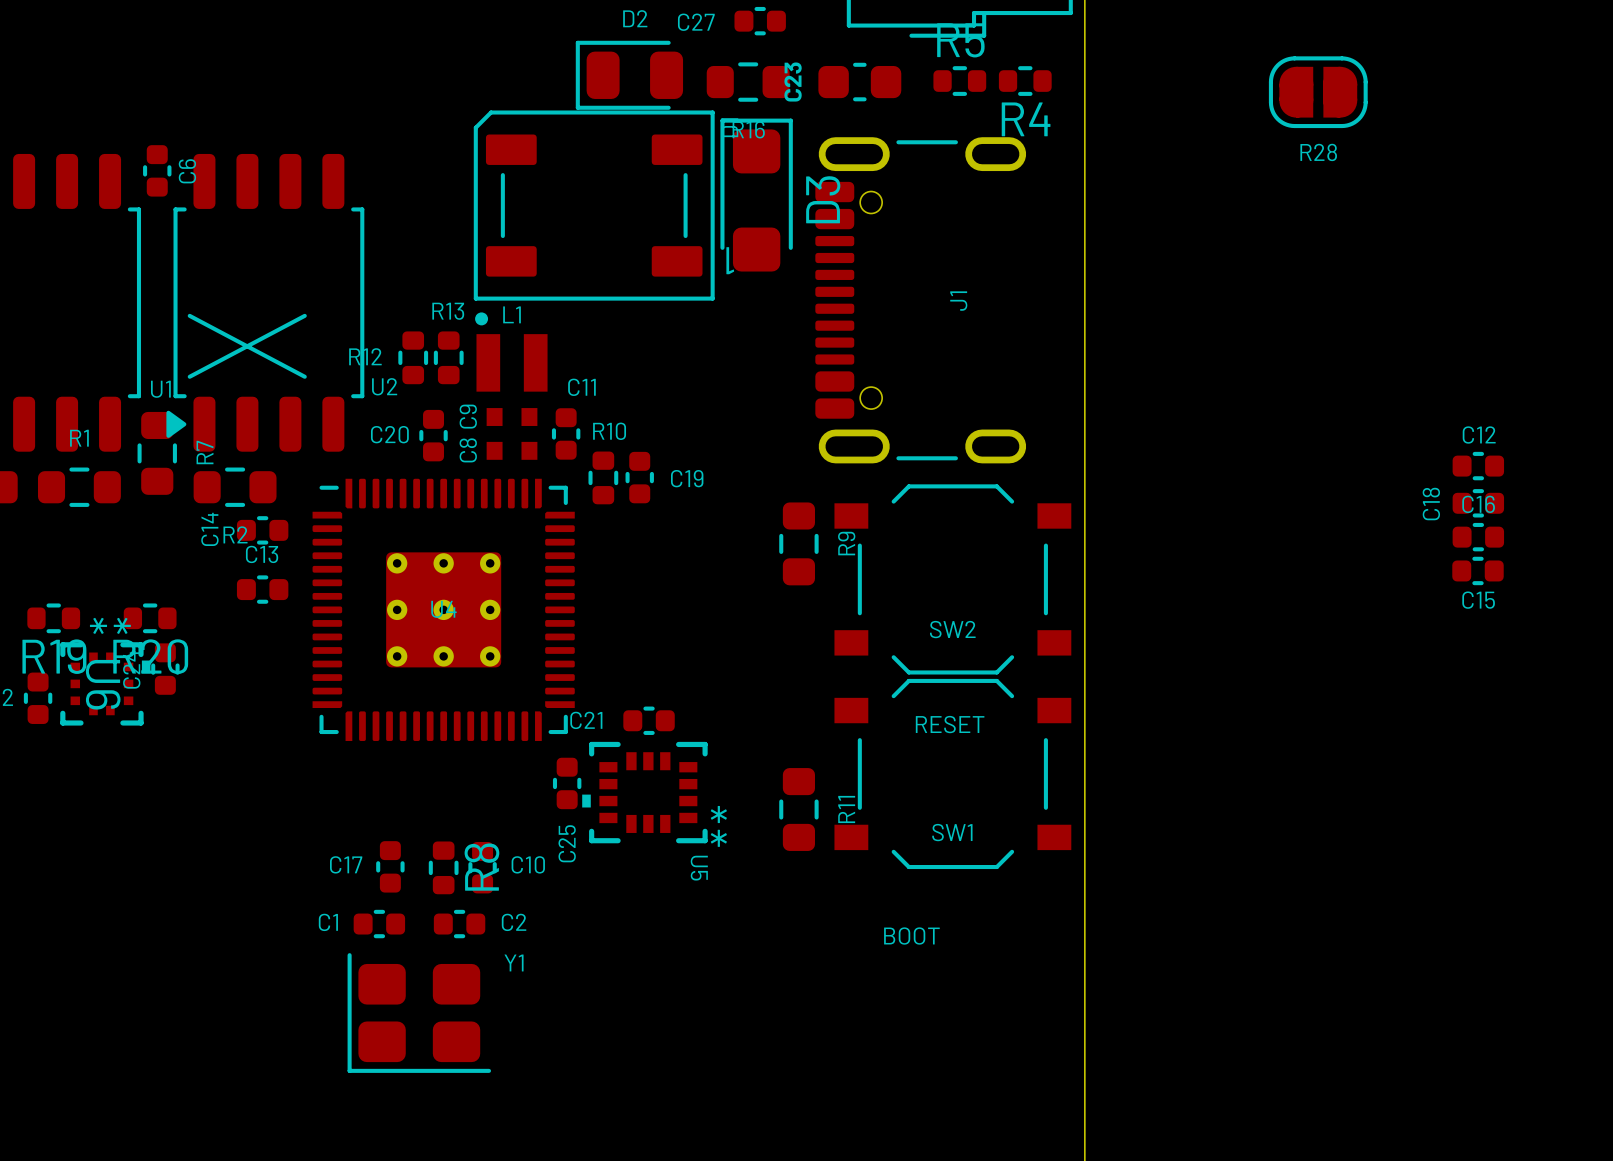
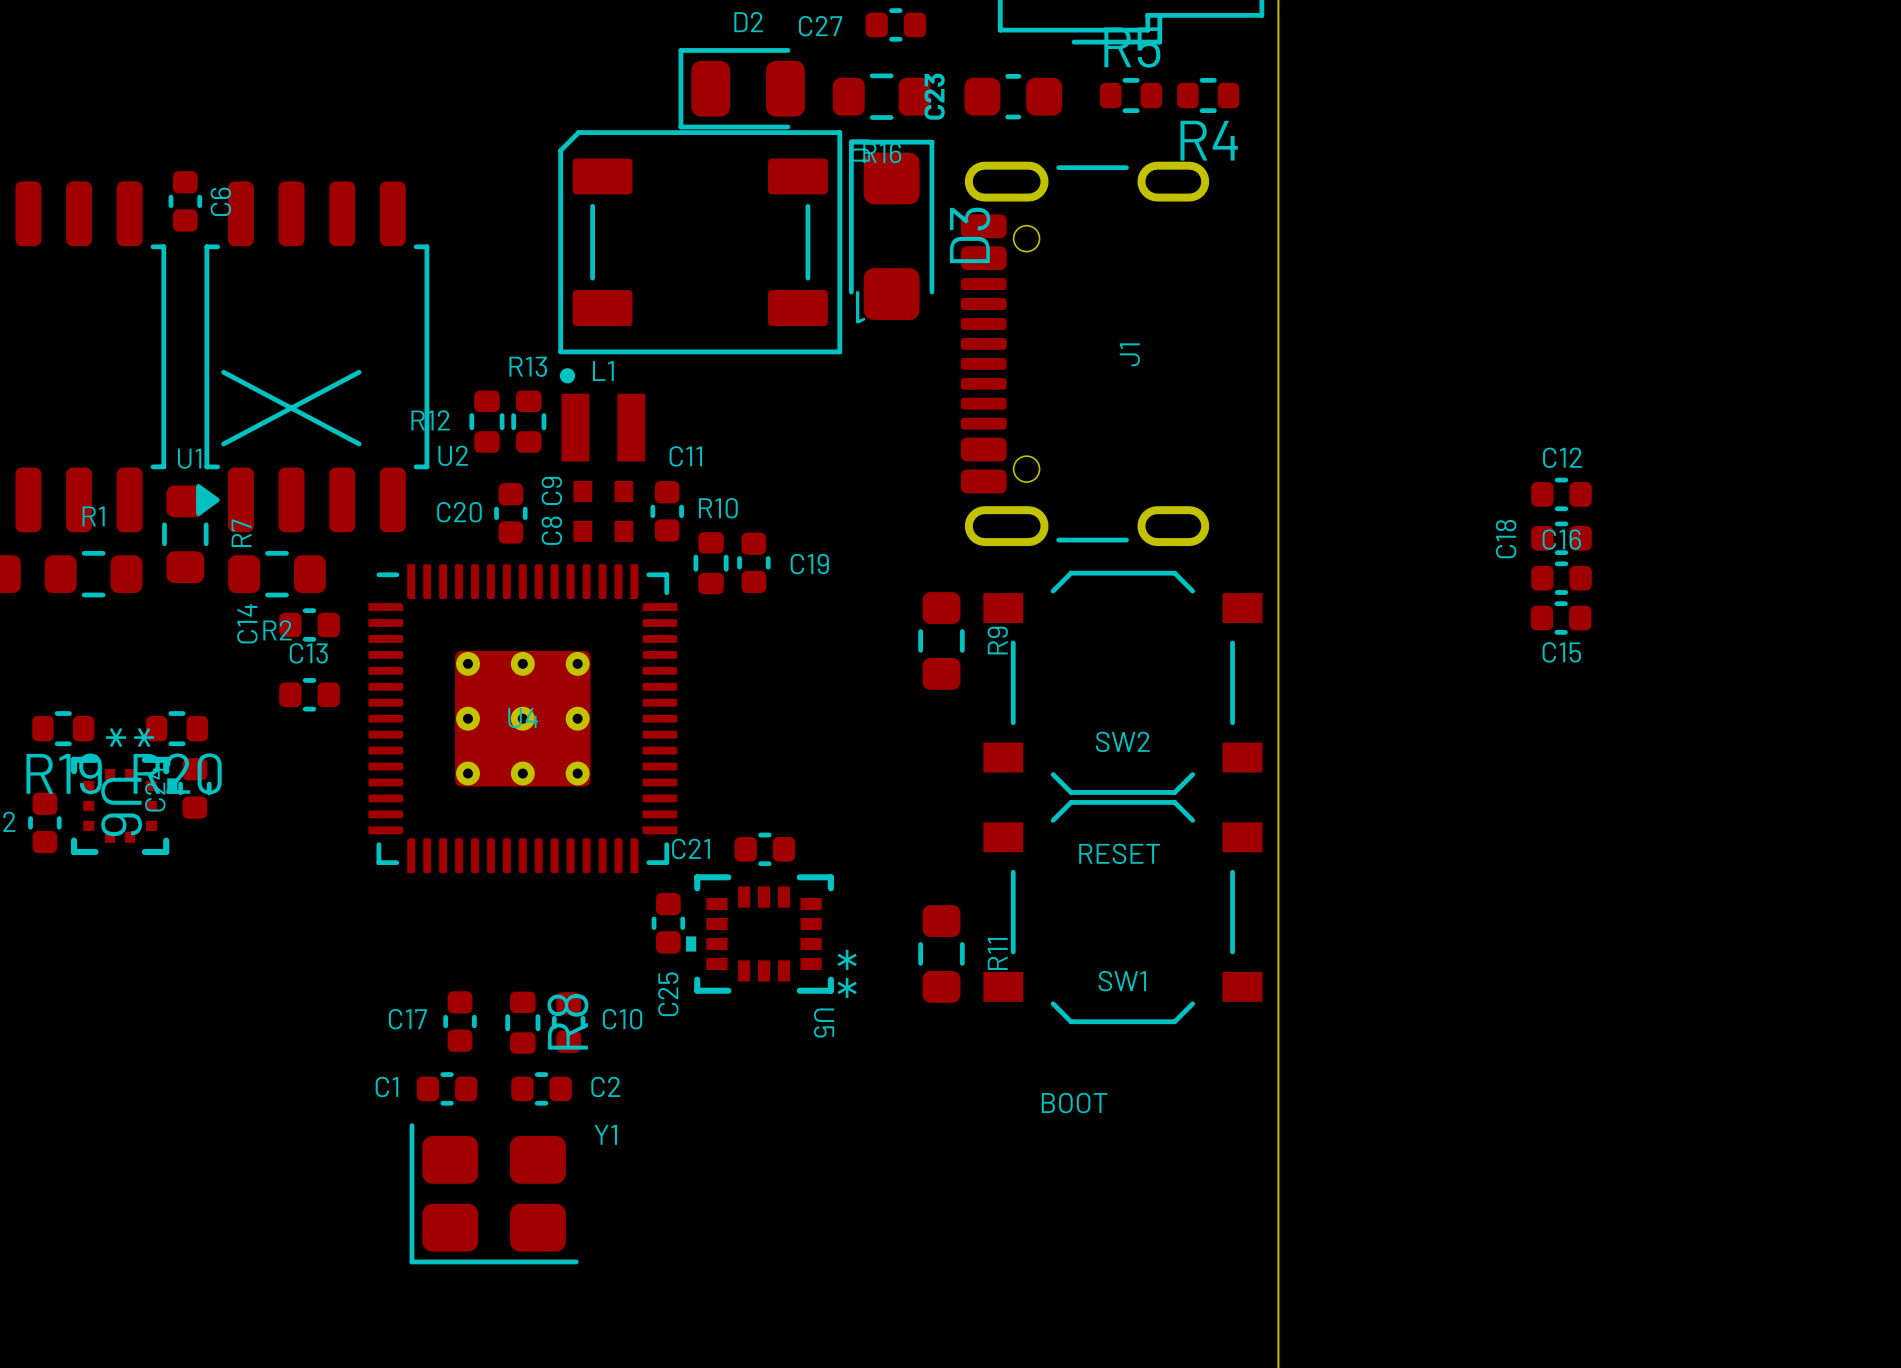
R28: (1318, 92) -> none
C12 position: (1478, 466) -> (1561, 494)
C18 position: (1478, 503) -> (1561, 538)
C16 position: (1478, 537) -> (1561, 578)
C15 position: (1477, 570) -> (1561, 618)

